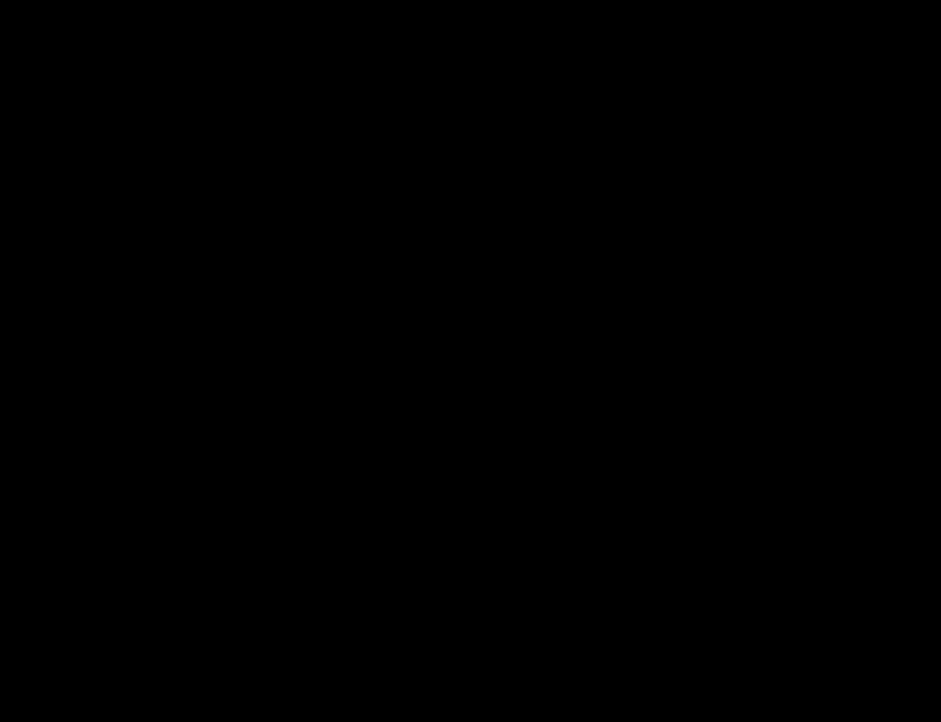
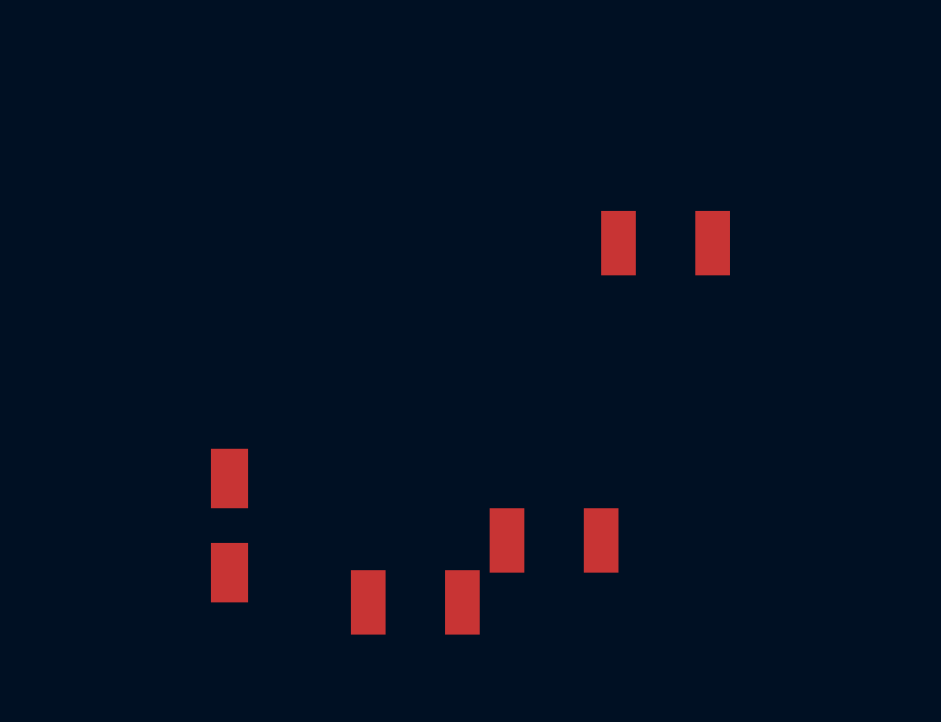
part: none -> (665, 243)
part: none -> (229, 525)
part: none -> (554, 540)
part: none -> (415, 602)

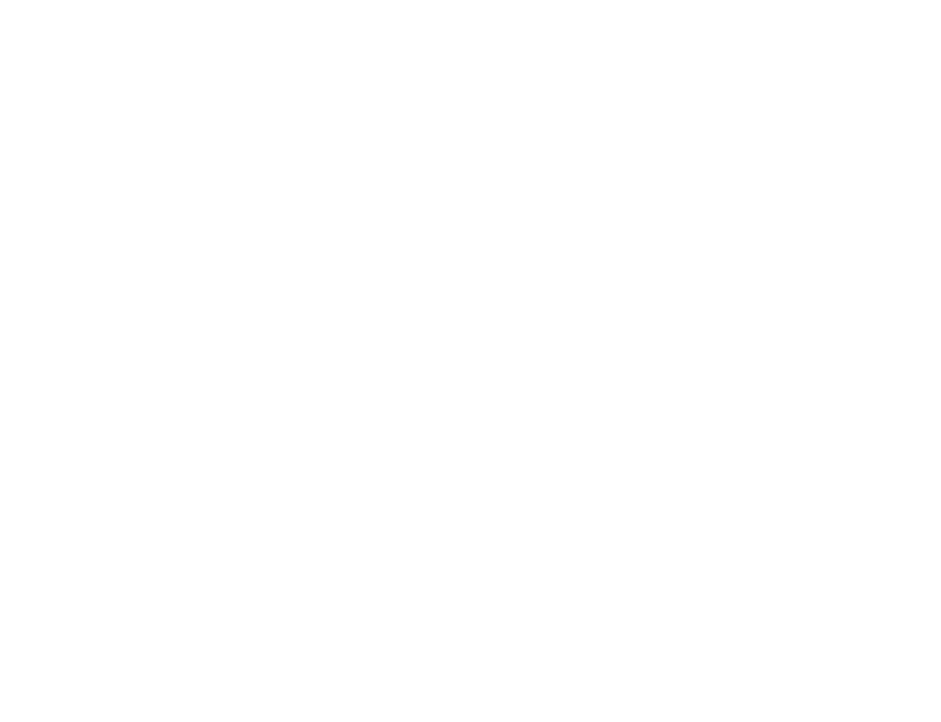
part: (665, 243) -> none
part: (229, 525) -> none
part: (554, 540) -> none
part: (415, 602) -> none

